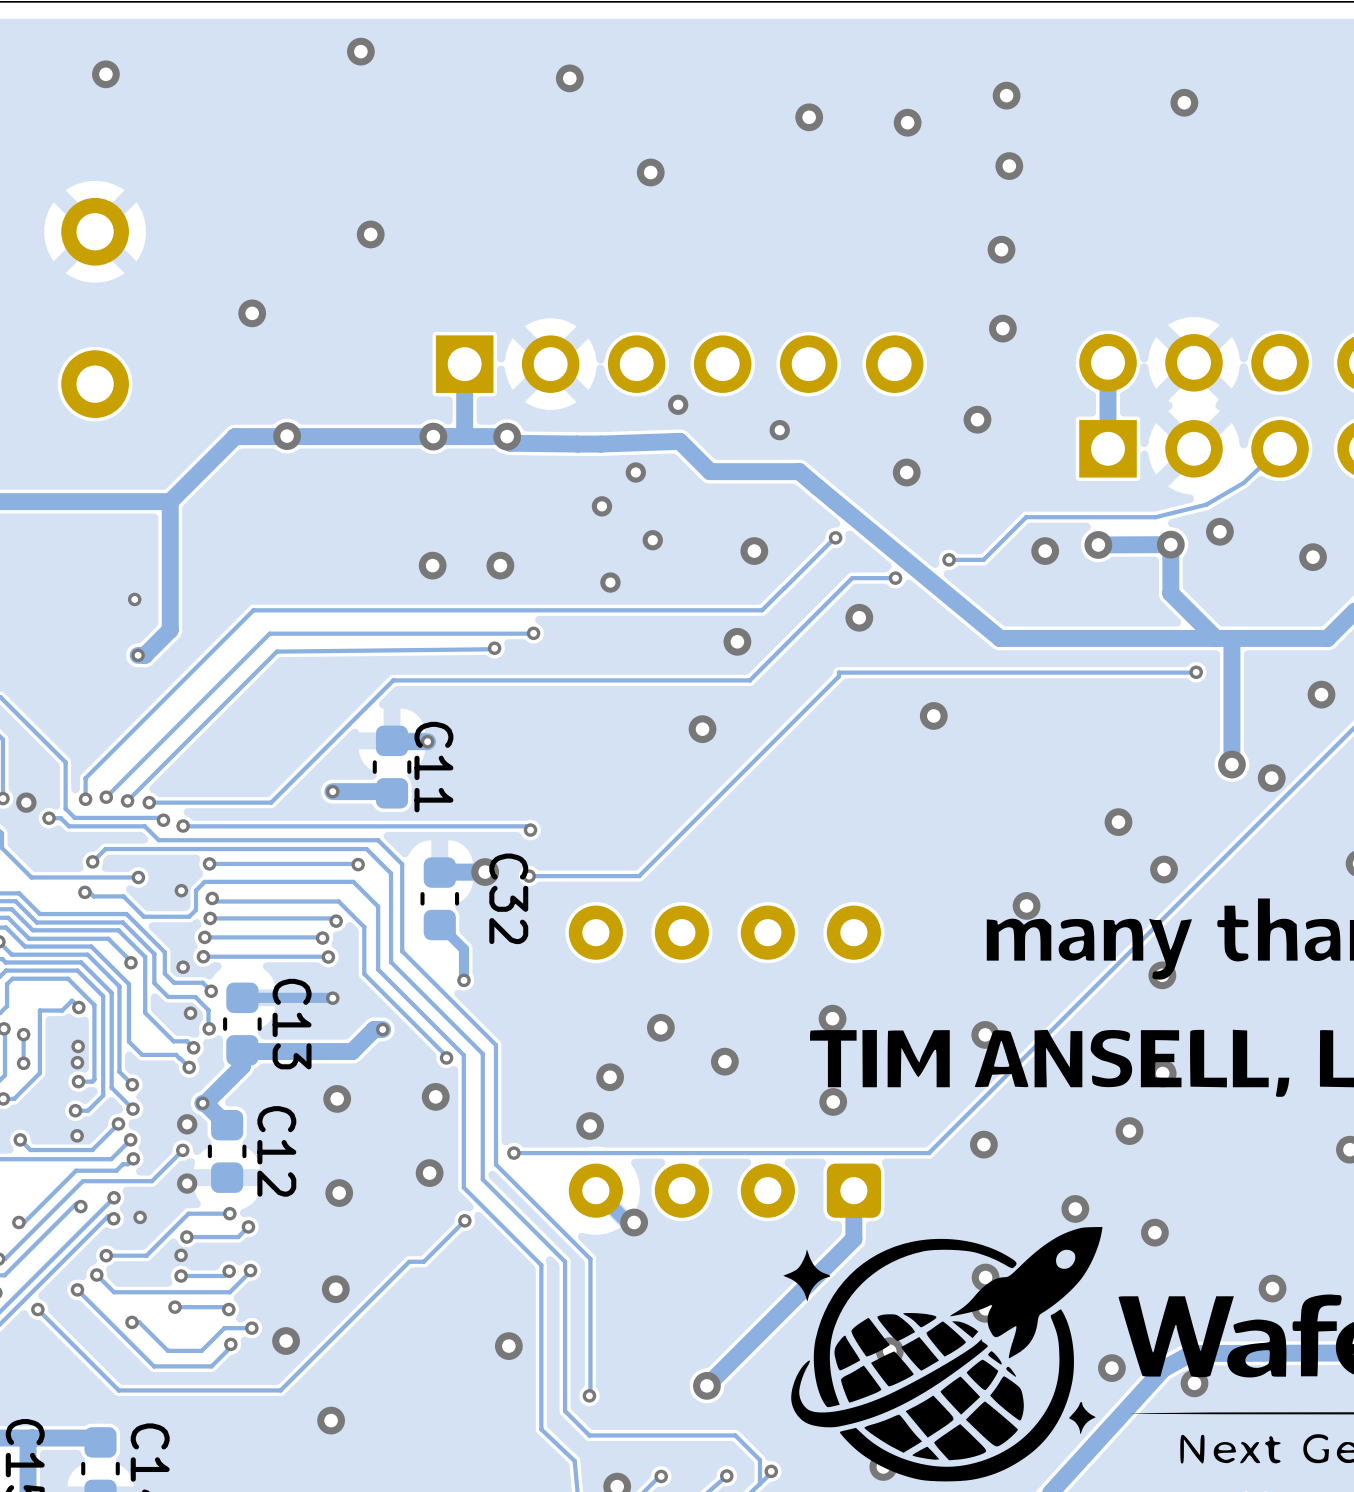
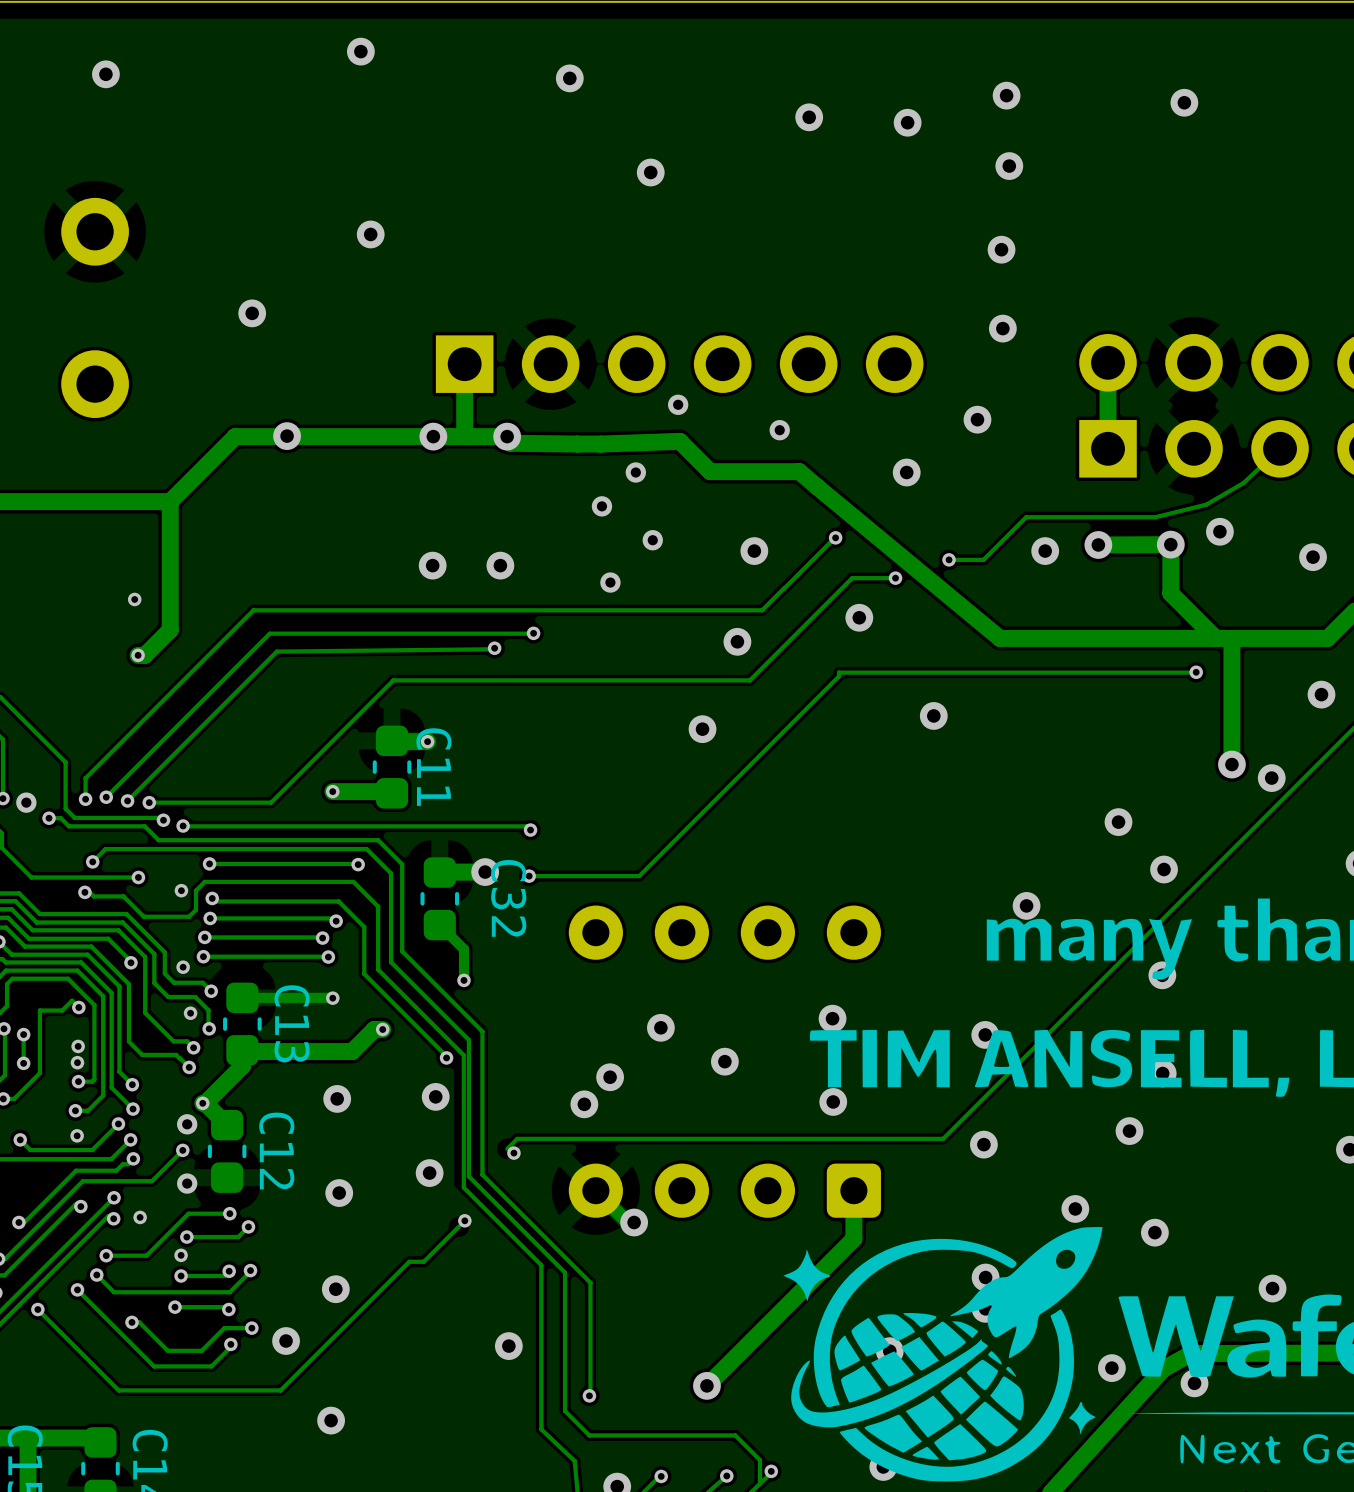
track: (482, 1031) (495, 1045) (495, 1164) (590, 1259) (590, 1282) -> (482, 1031) (482, 1174) (590, 1282)
track: (468, 1040) (482, 1053) (482, 1179) (565, 1261) (565, 1272) -> (468, 1040) (468, 1176) (565, 1272)
via position: (590, 1126) -> (584, 1104)
track: (943, 1138) (928, 1153) (513, 1153) -> (943, 1138) (517, 1138) (507, 1148)

